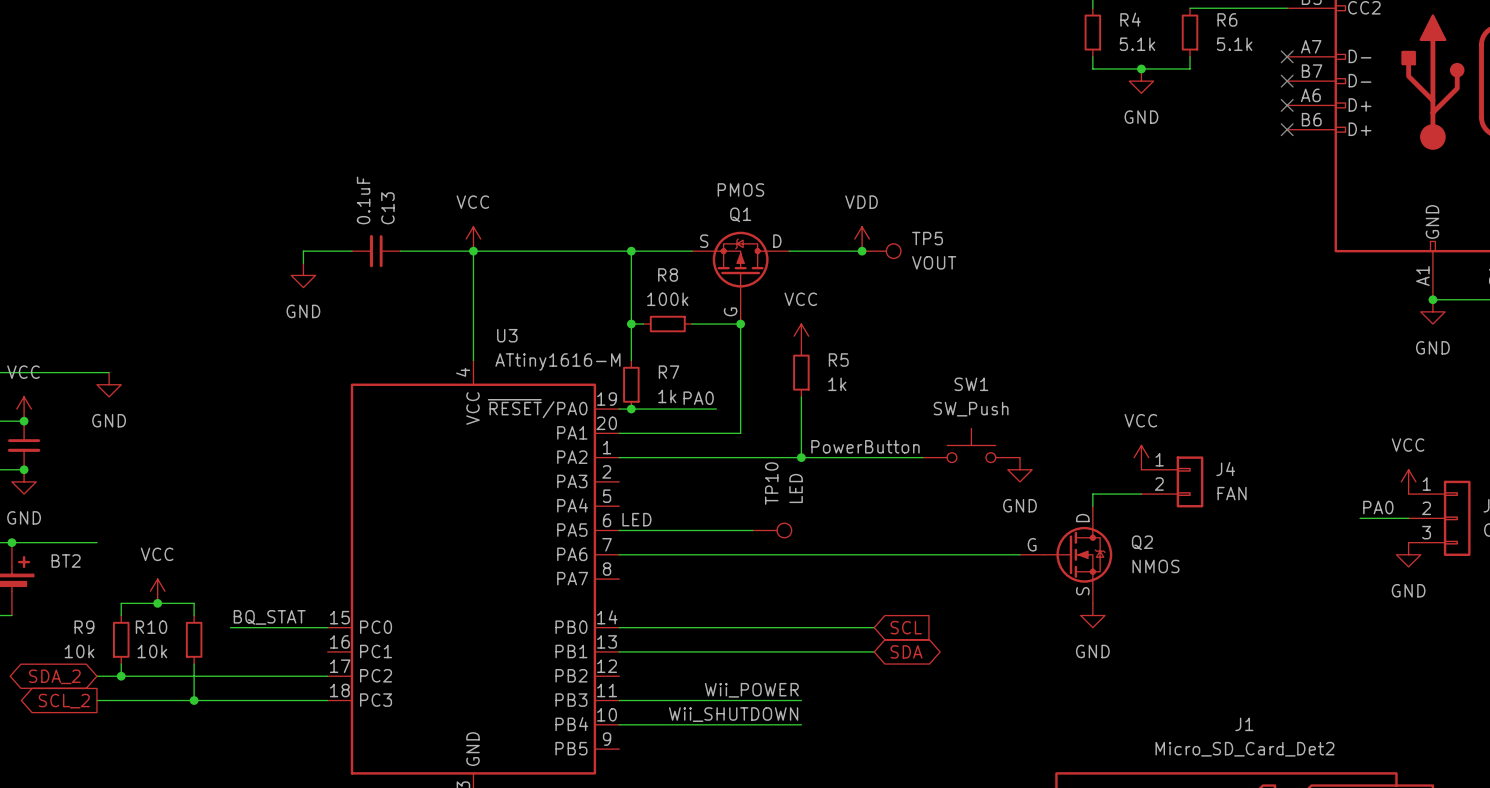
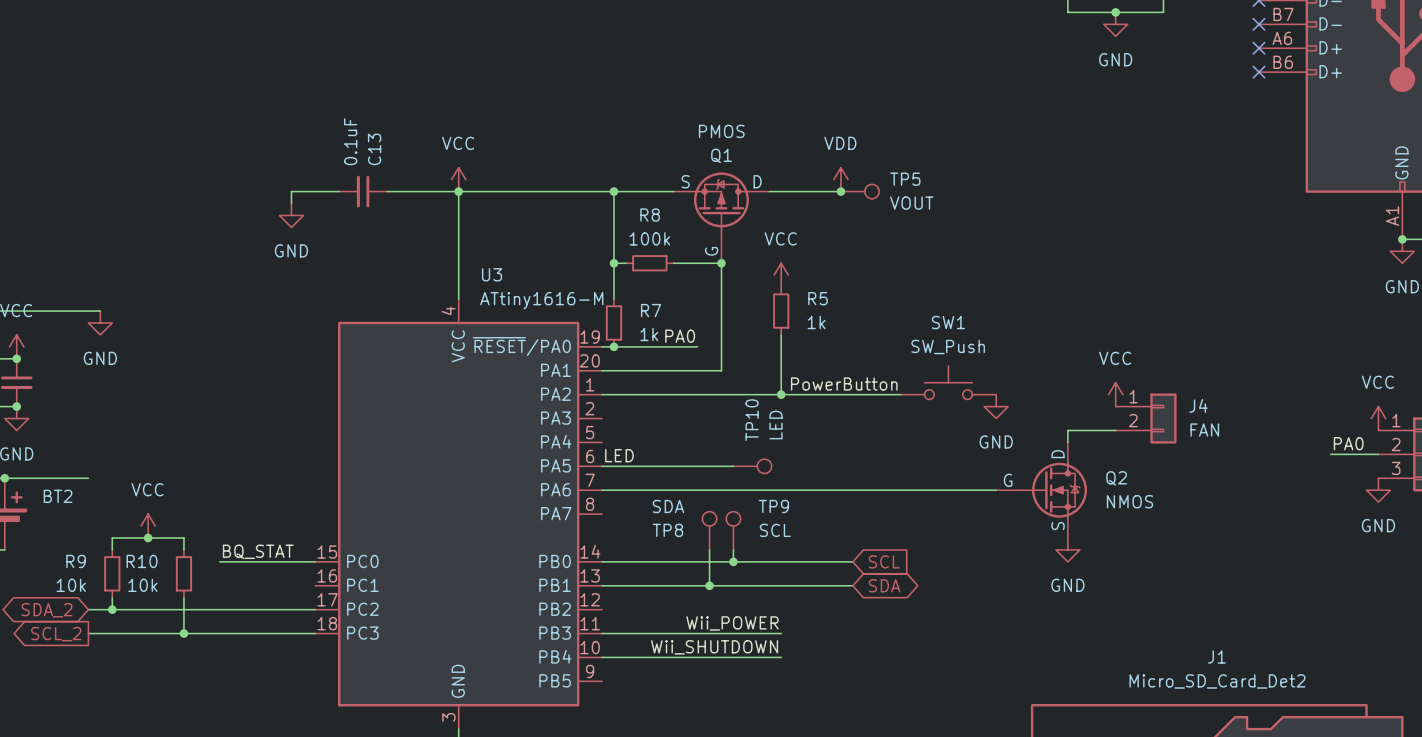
TP8: none -> SDA (709, 530)
TP9: none -> SCL (733, 530)
wire: none -> (709, 549) (709, 585)
wire: none -> (733, 549) (733, 561)
junction: none -> (733, 561)
junction: none -> (709, 585)

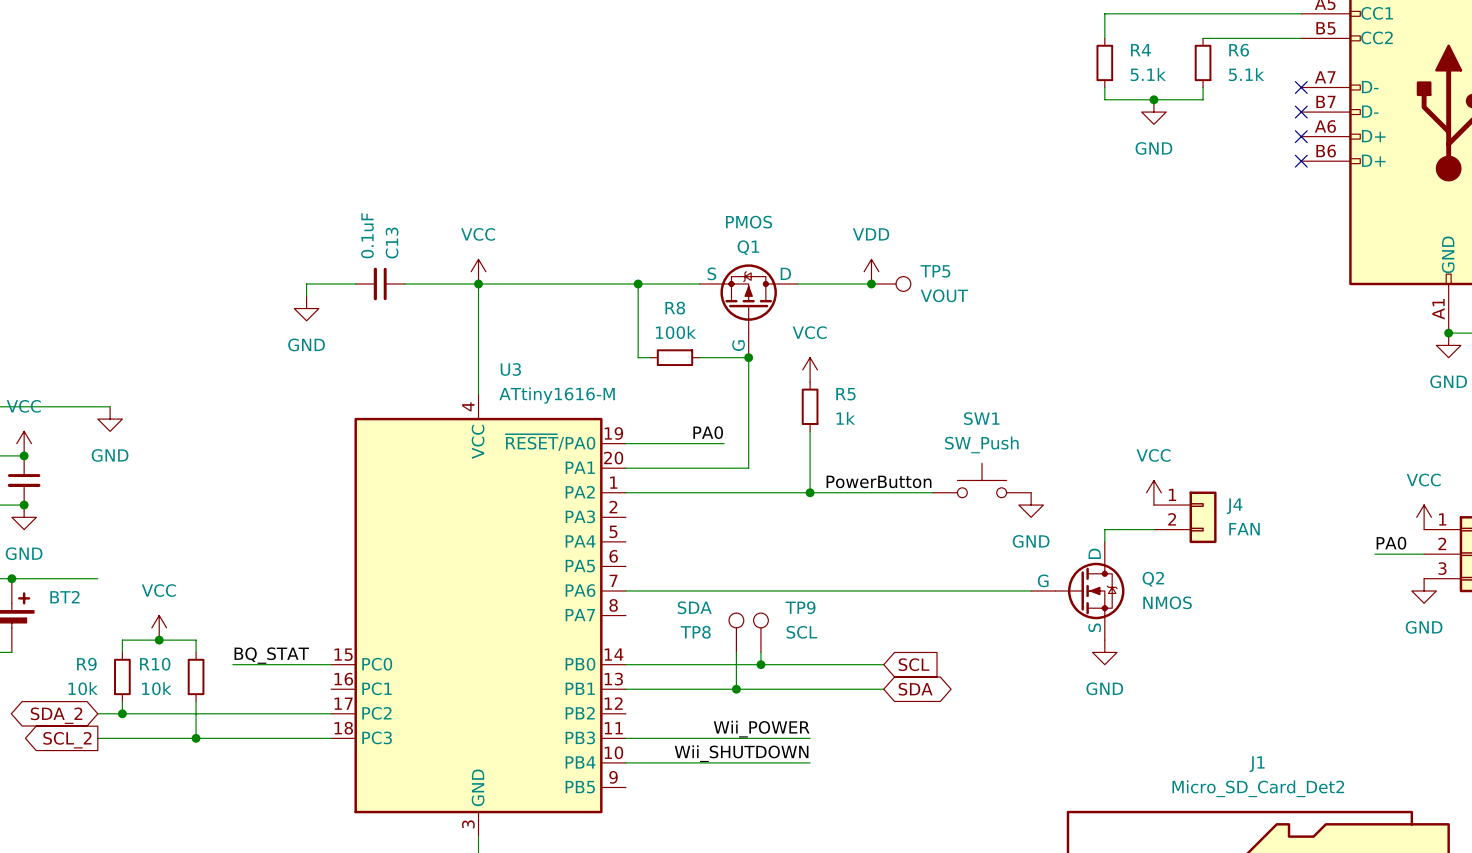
wire: (613, 263) (613, 299) -> none
junction: (613, 263) -> none
R7: 1k (613, 322) -> none
junction: (613, 346) -> none
label: LED (619, 455) -> none
wire: (602, 466) (733, 466) -> none
TP10: LED (752, 466) -> none

